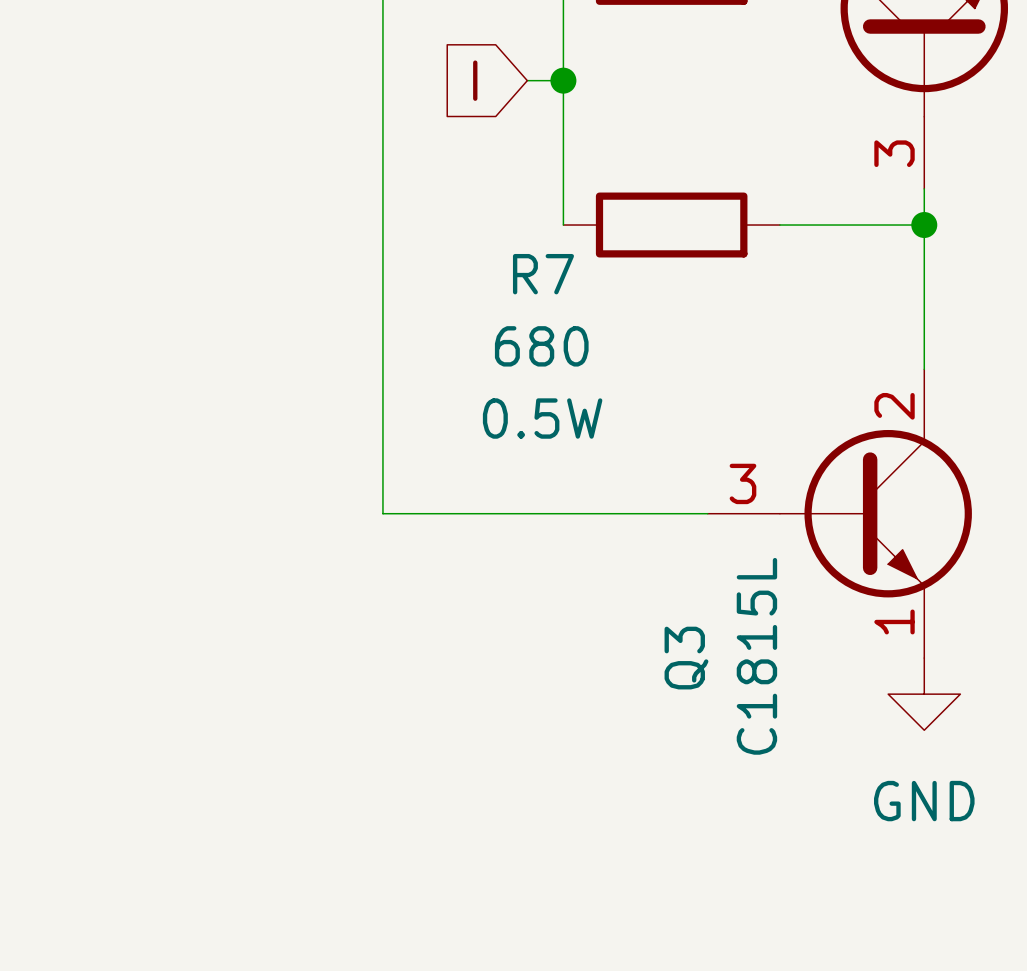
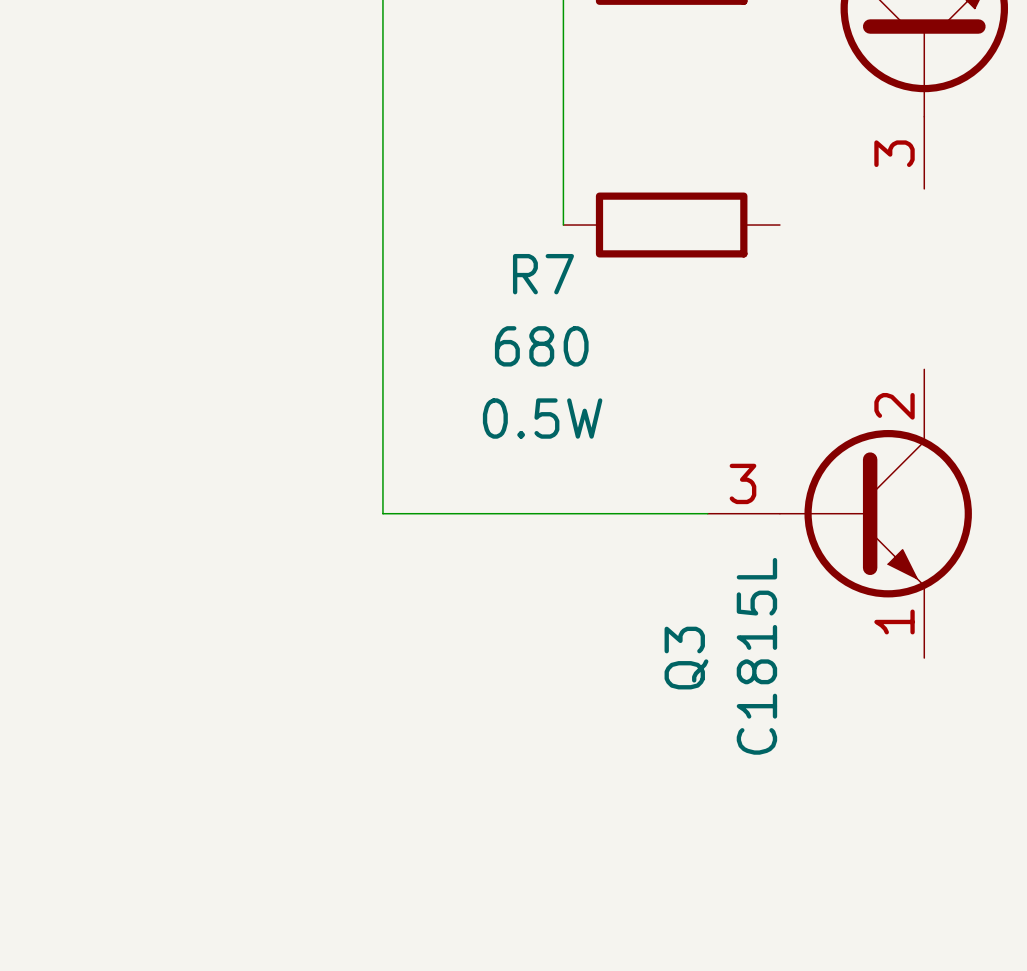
global label: I (475, 80) -> none
wire: (527, 80) (563, 80) -> none
junction: (563, 80) -> none
wire: (924, 188) (924, 369) -> none
wire: (779, 225) (924, 225) -> none
junction: (924, 225) -> none
power symbol: GND (924, 694) -> none

